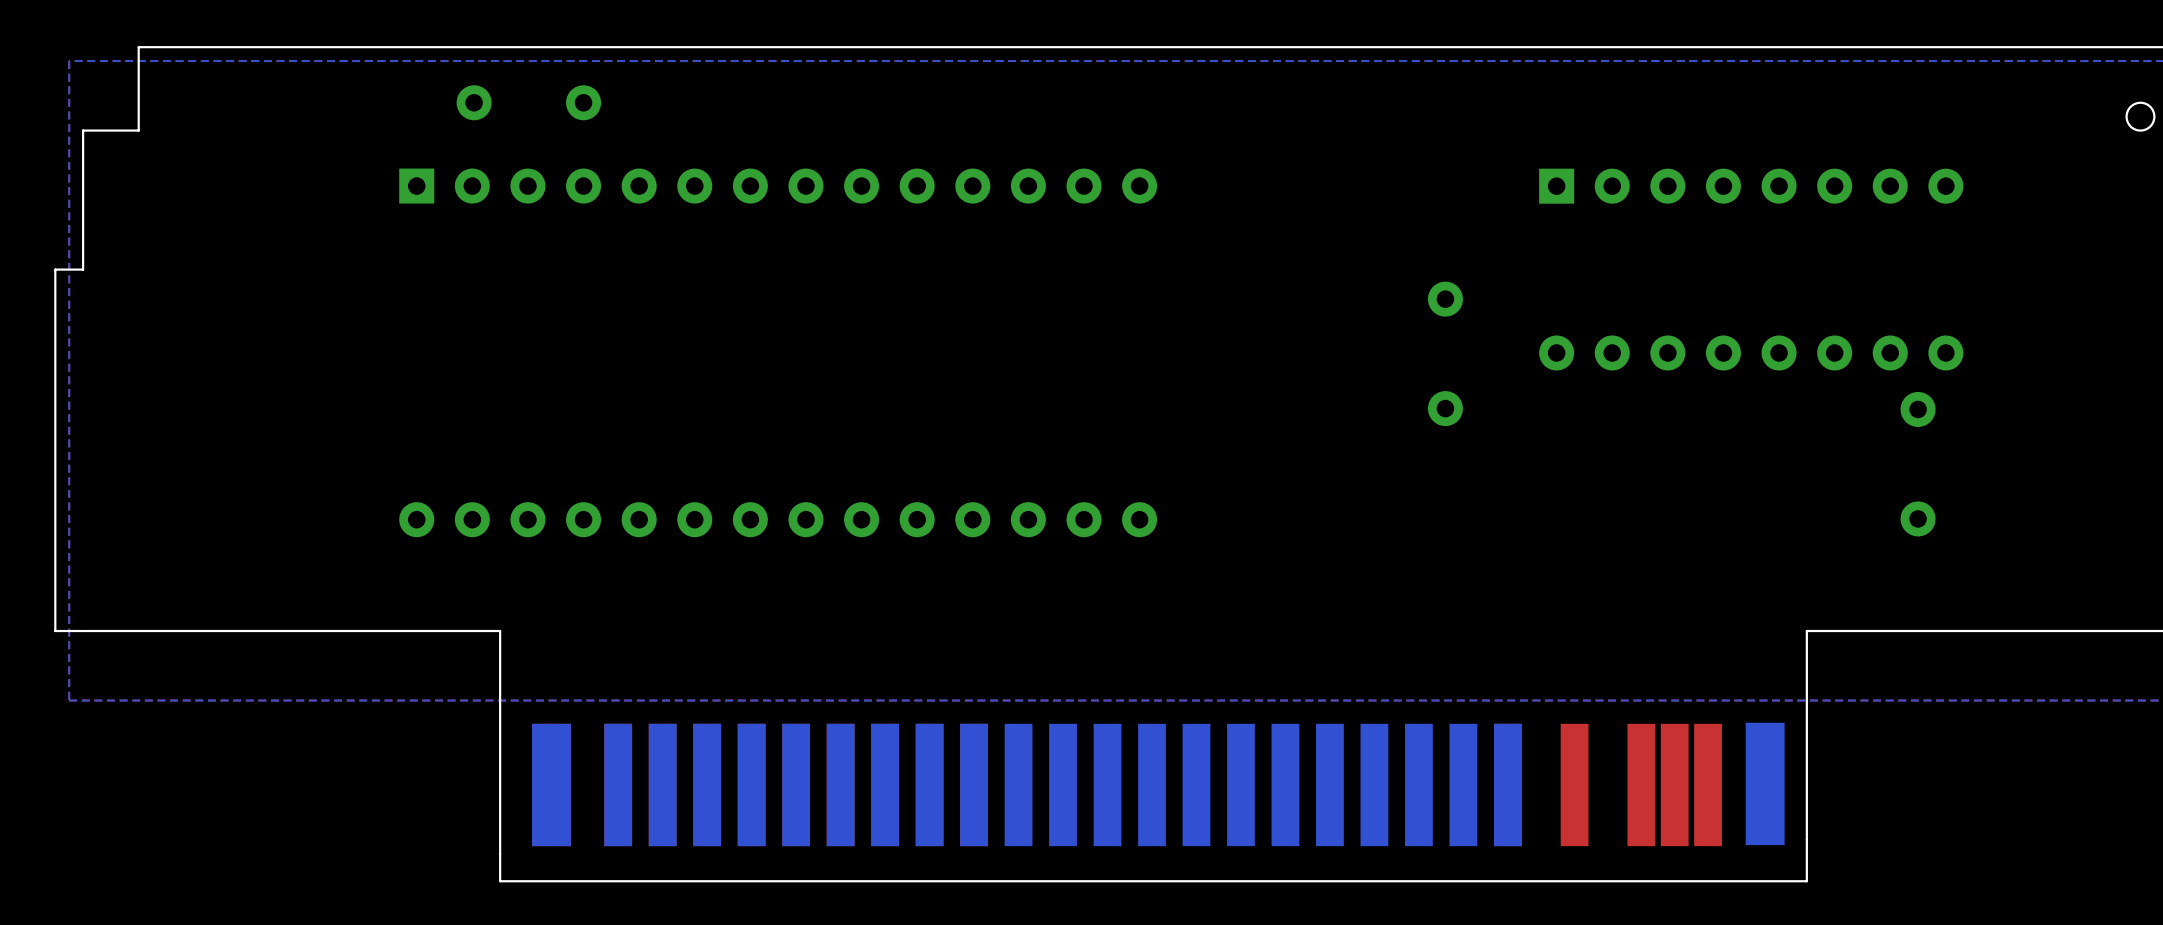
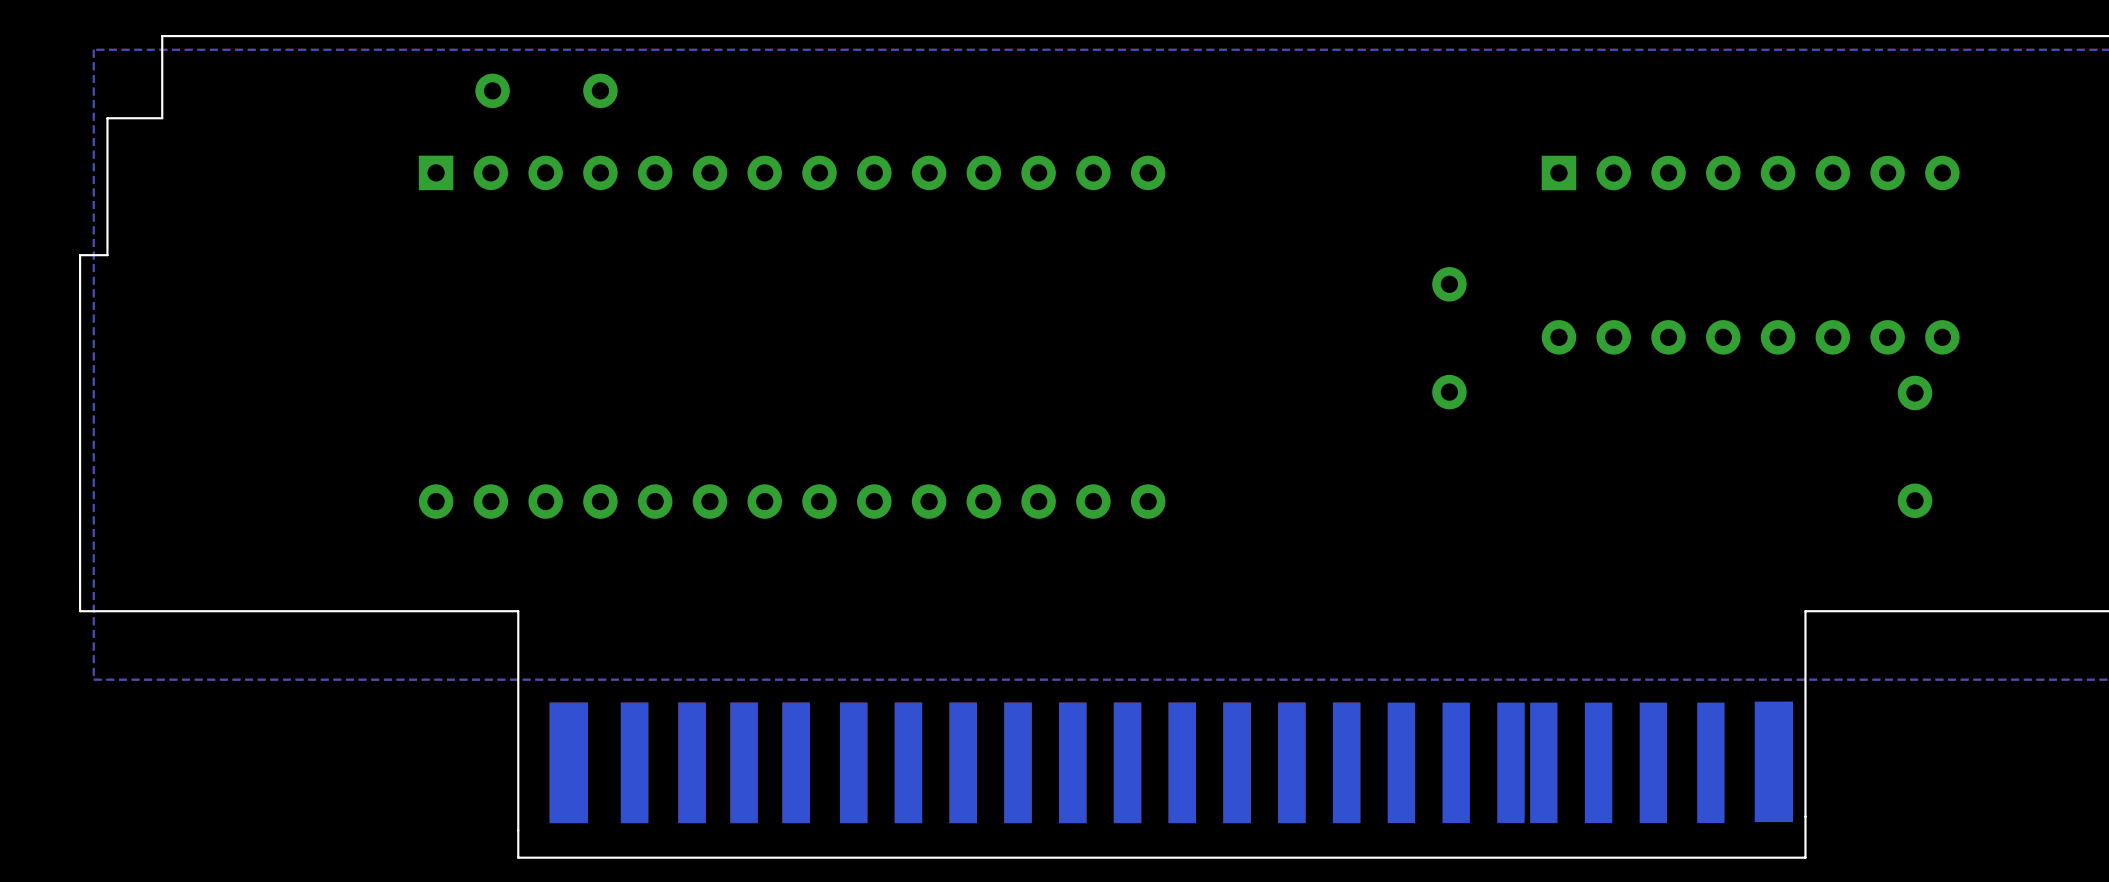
part footprint: [532, 722, 1785, 847] -> [549, 701, 1794, 824]

